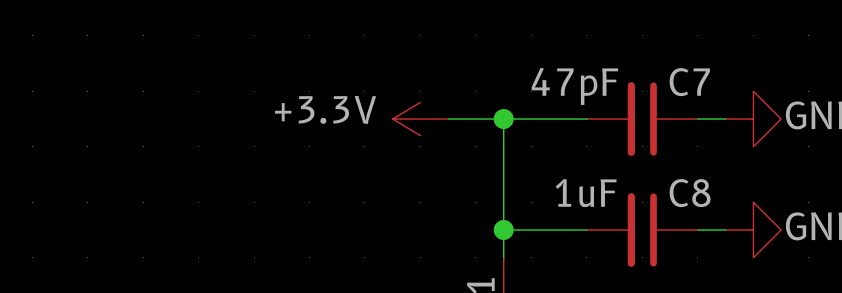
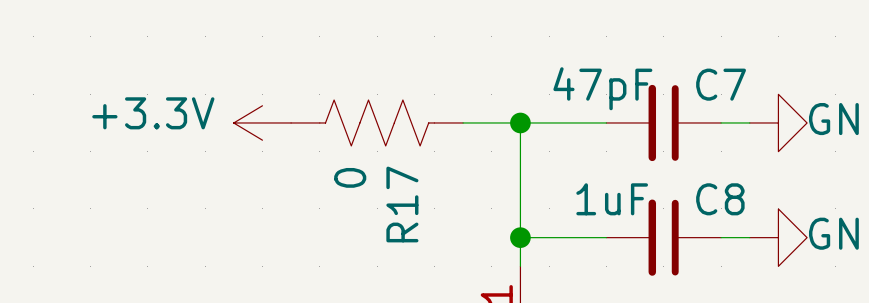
R17: none -> 0 (377, 122)
power symbol position: +3.3V (420, 119) -> +3.3V (262, 122)

